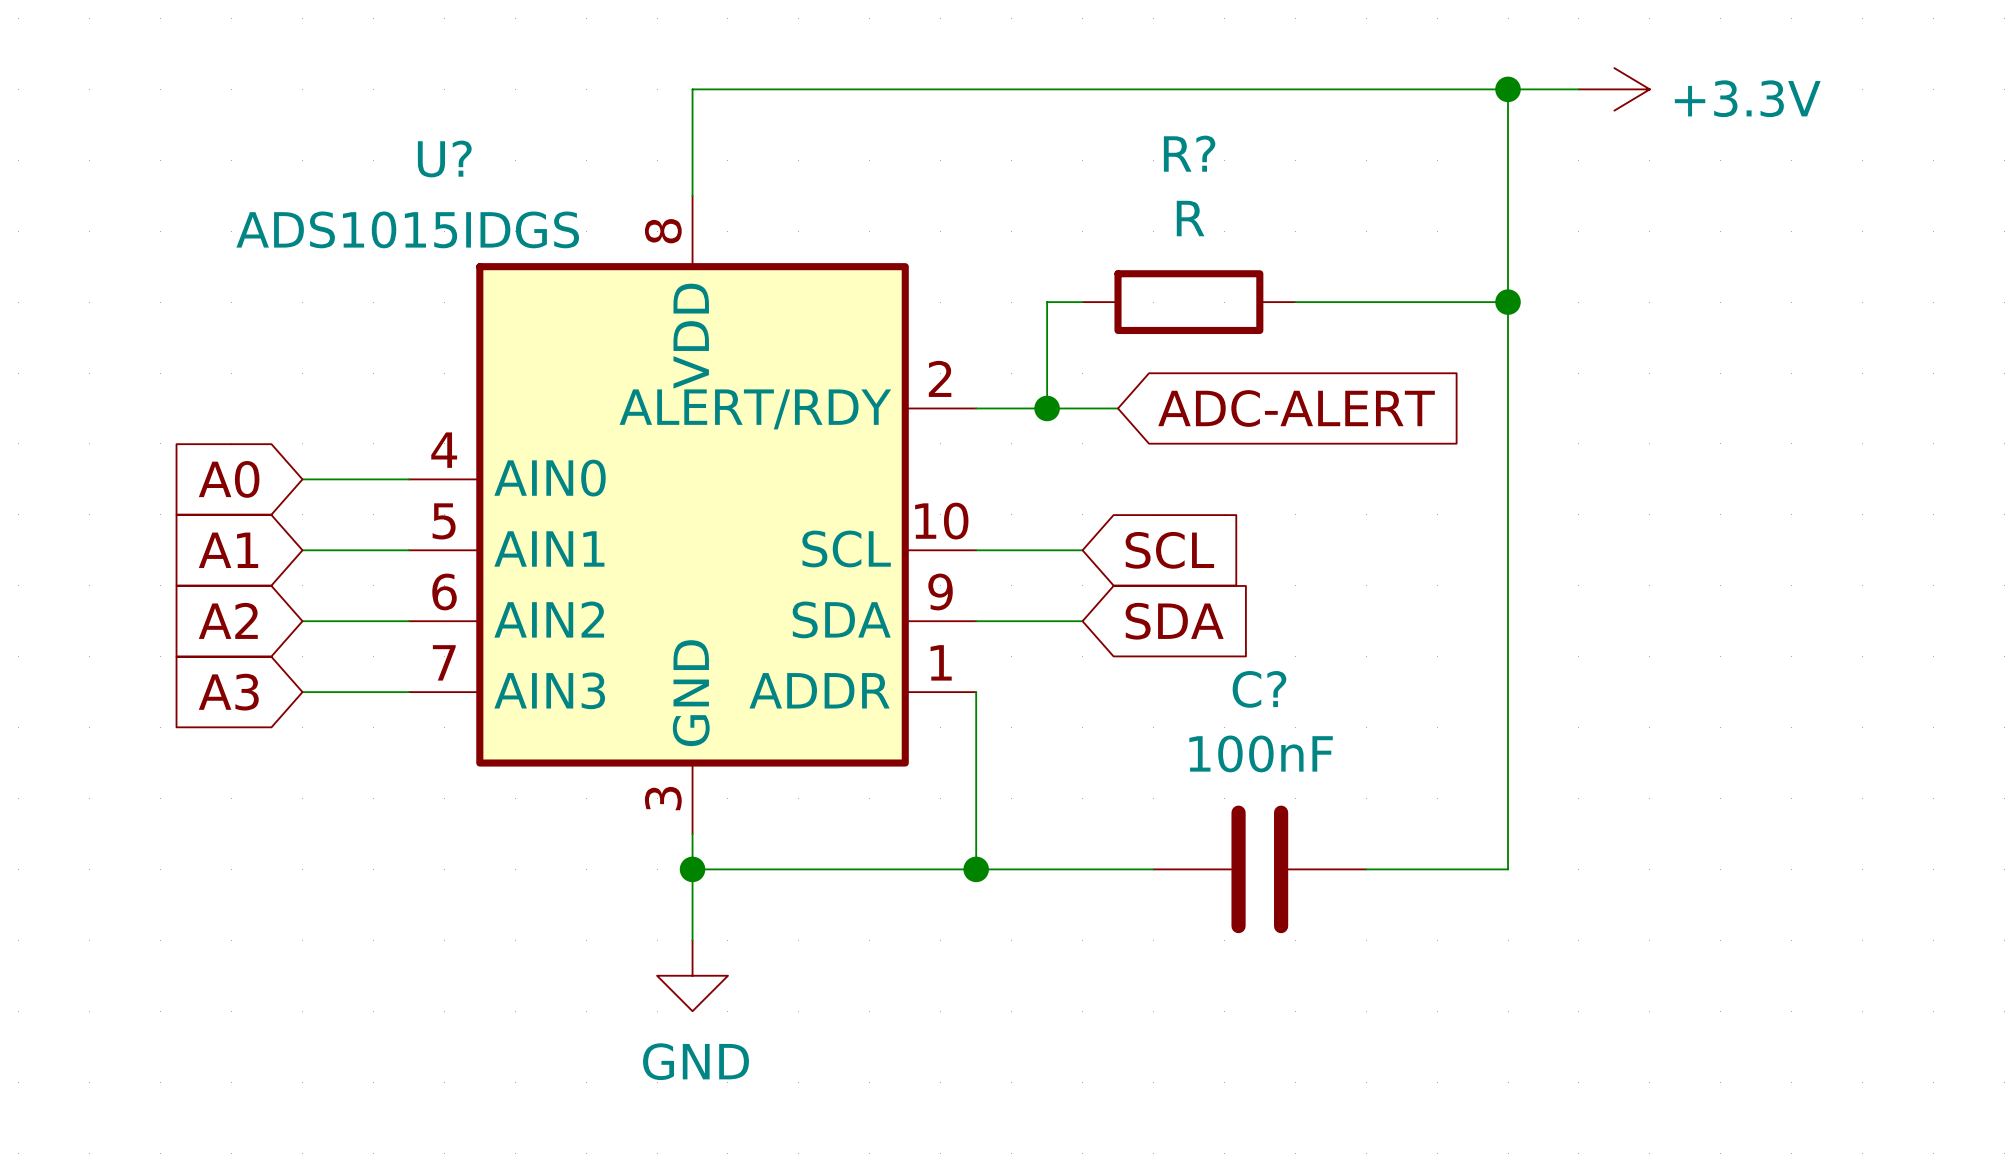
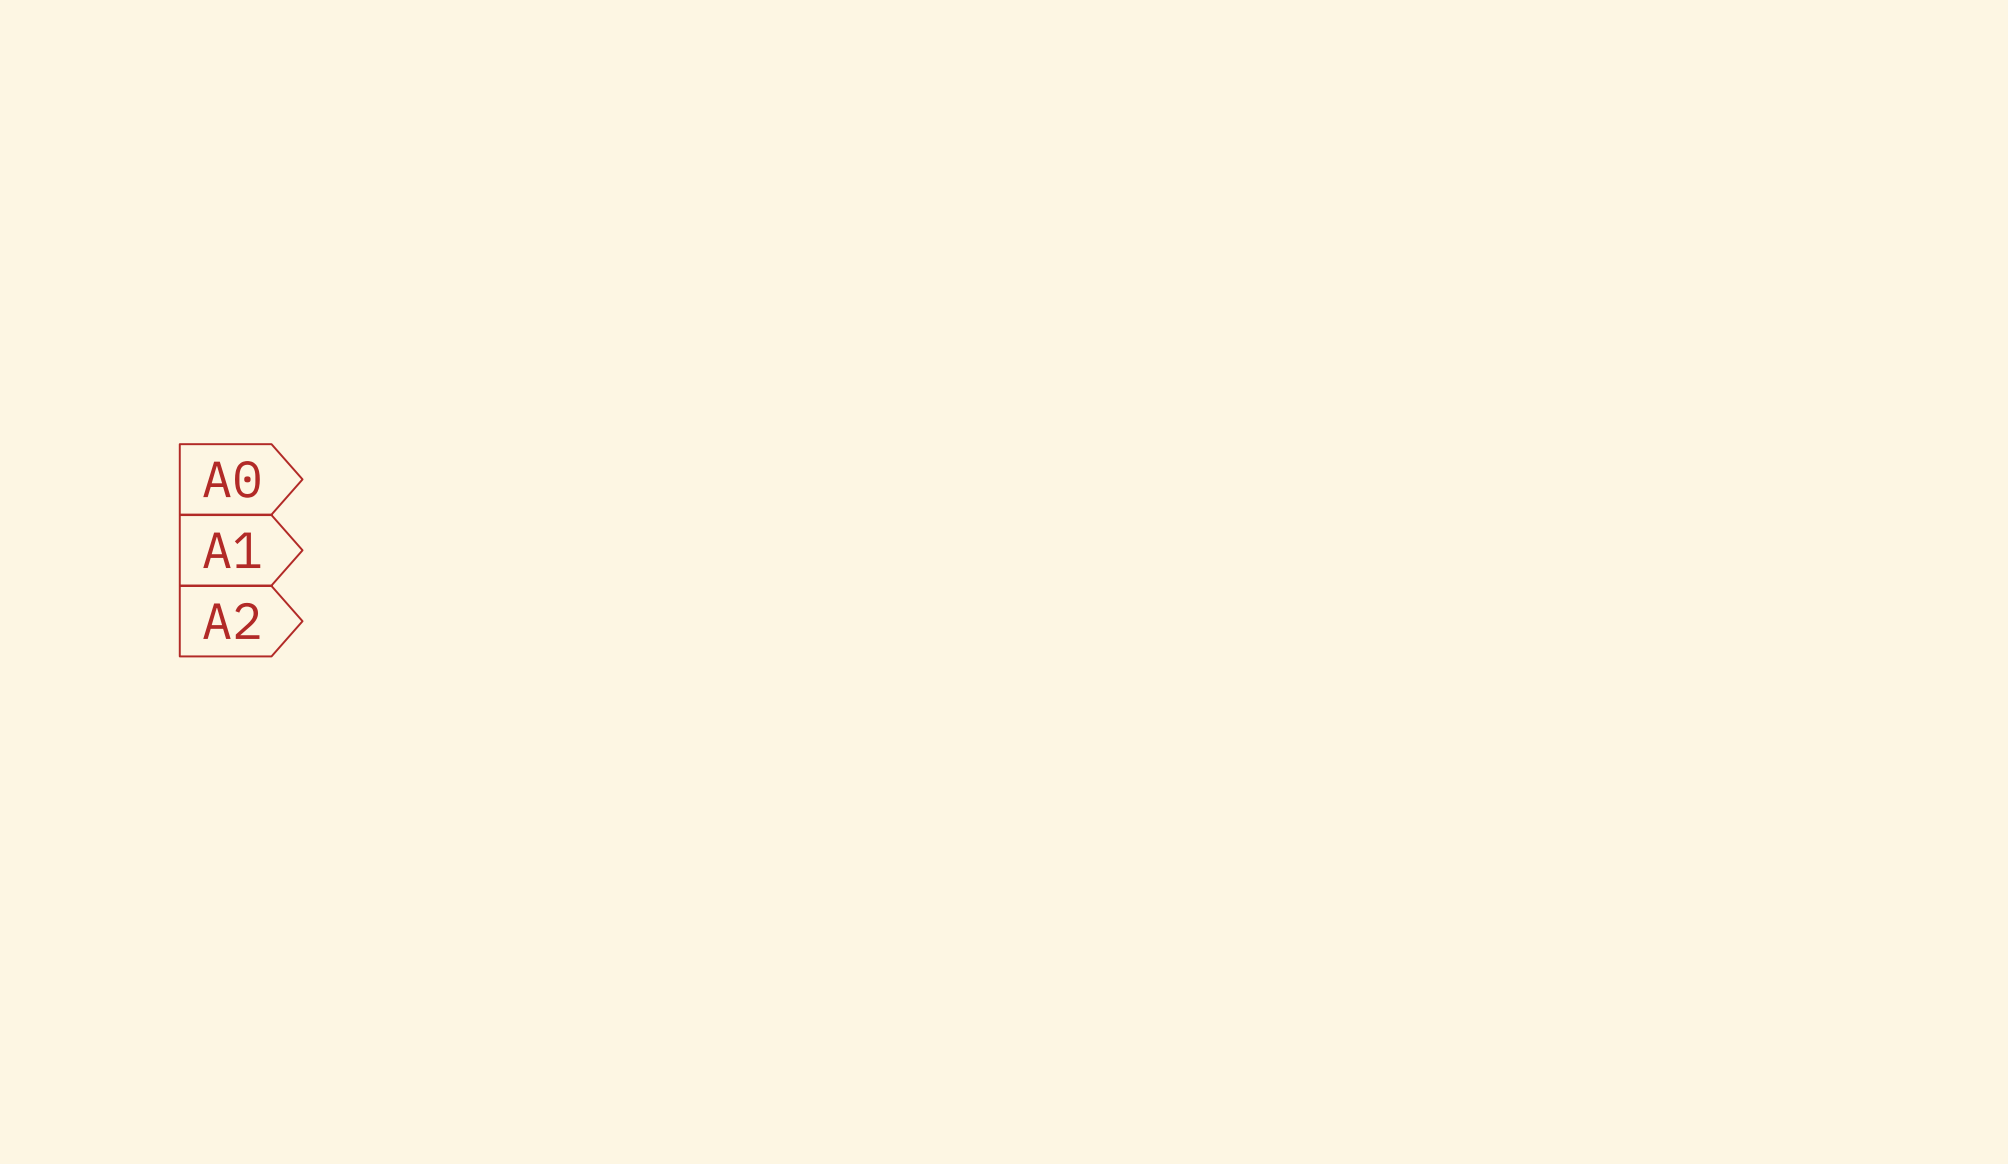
wire: (1508, 89) (1508, 869) (1366, 869) -> none
junction: (1508, 89) -> none
wire: (1578, 89) (692, 89) (692, 195) -> none
power symbol: +3.3V (1614, 89) -> none
wire: (1082, 302) (1047, 302) (1047, 408) -> none
R?: R (1188, 302) -> none
wire: (1295, 302) (1508, 302) -> none
junction: (1508, 302) -> none
wire: (976, 408) (1118, 408) -> none
junction: (1047, 408) -> none
global label: ADC-ALERT (1296, 408) -> none
wire: (302, 479) (408, 479) -> none
U?: ADS1015IDGS (692, 514) -> none
wire: (302, 550) (408, 550) -> none
wire: (976, 550) (1082, 550) -> none
global label: SCL (1169, 550) -> none
wire: (302, 621) (408, 621) -> none
wire: (976, 621) (1082, 621) -> none
global label: SDA (1174, 621) -> none
global label: A3 (228, 692) -> none
wire: (302, 692) (408, 692) -> none
wire: (976, 692) (976, 869) -> none
wire: (692, 833) (692, 940) -> none
wire: (692, 869) (1153, 869) -> none
junction: (692, 869) -> none
junction: (976, 869) -> none
C?: 100nF (1259, 869) -> none
power symbol: GND (692, 975) -> none

